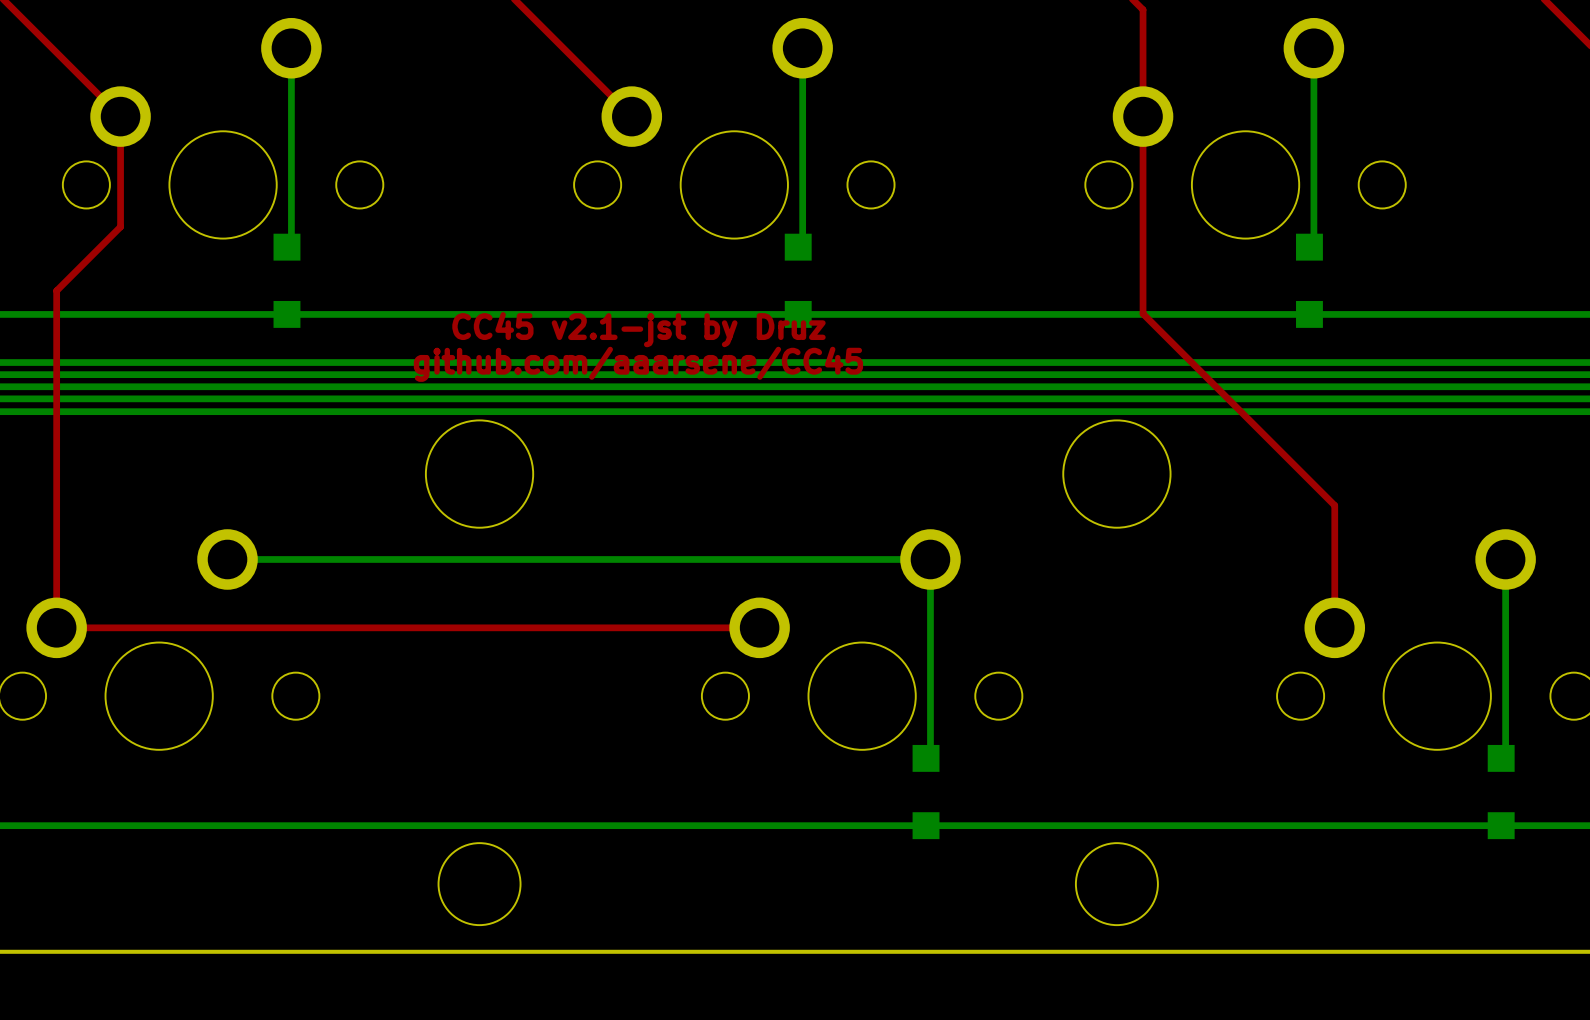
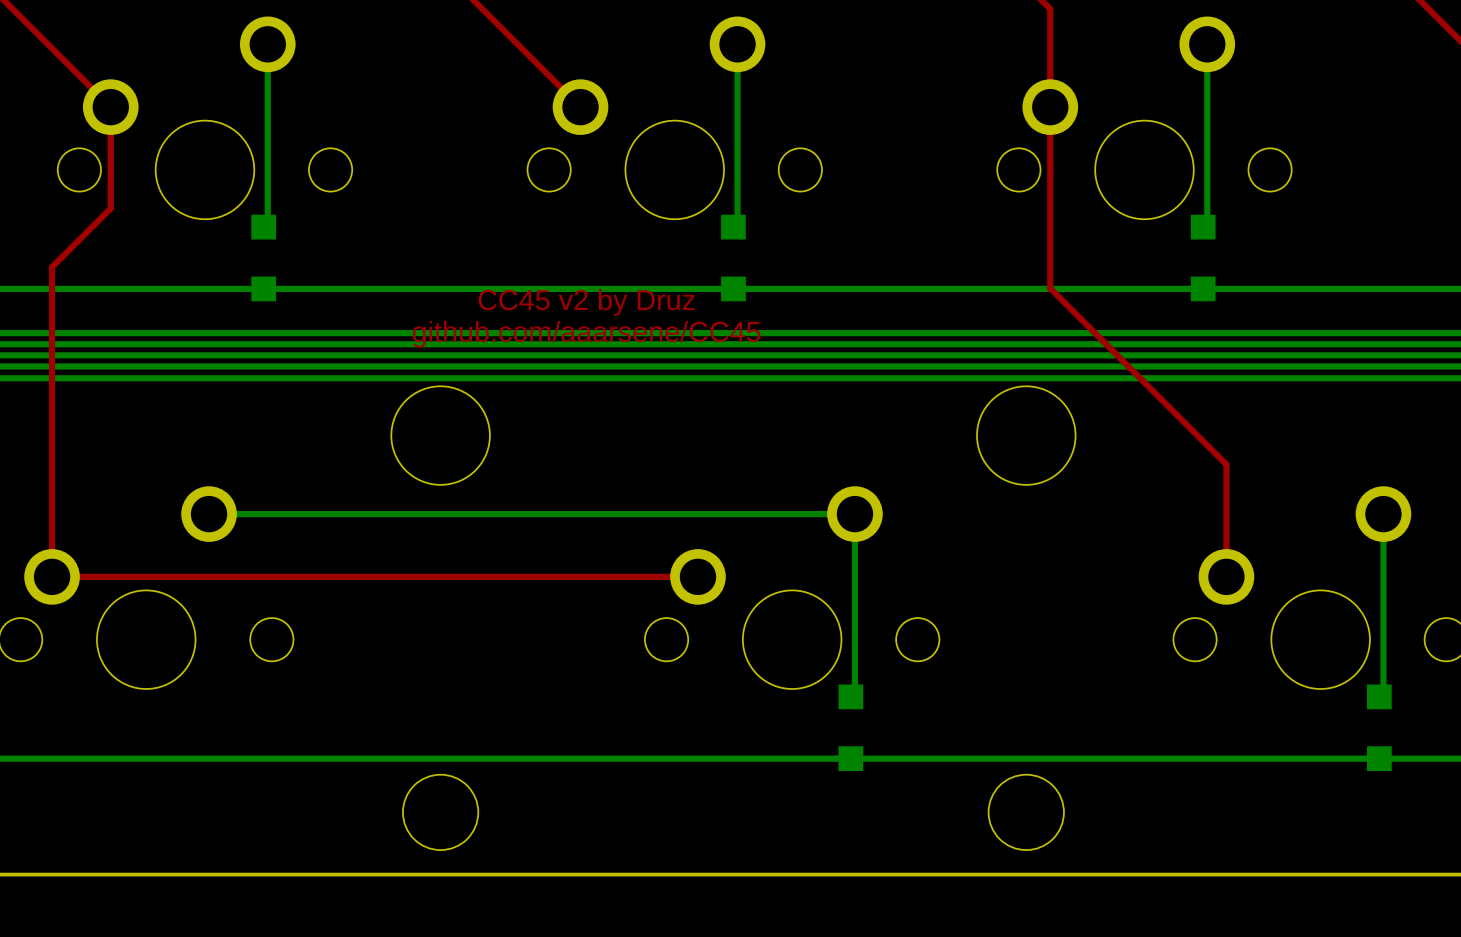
text: CC45 v2.1-jst by Druz (638, 329) -> CC45 v2 by Druz (586, 302)

